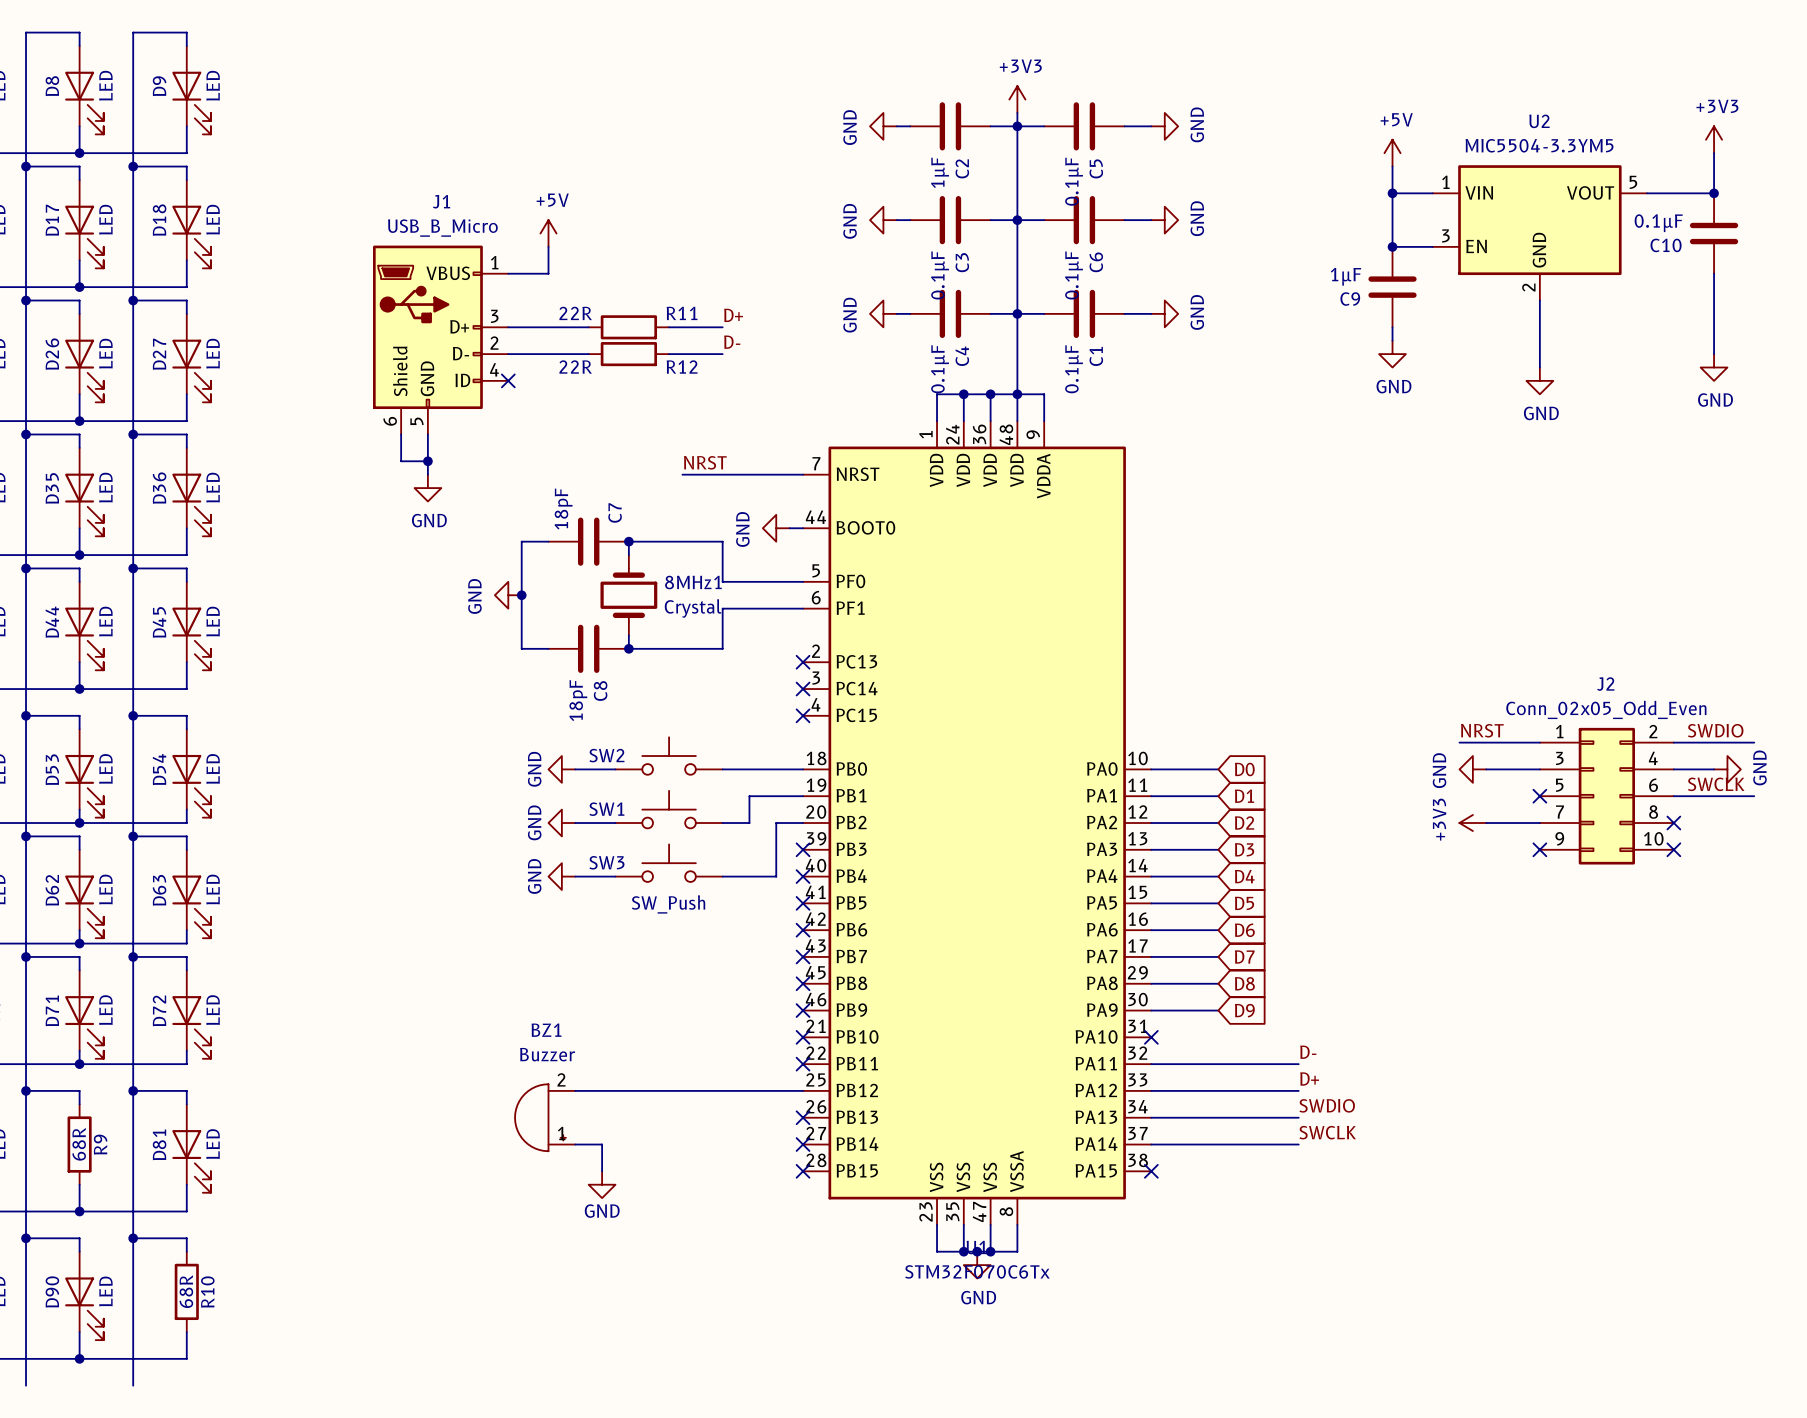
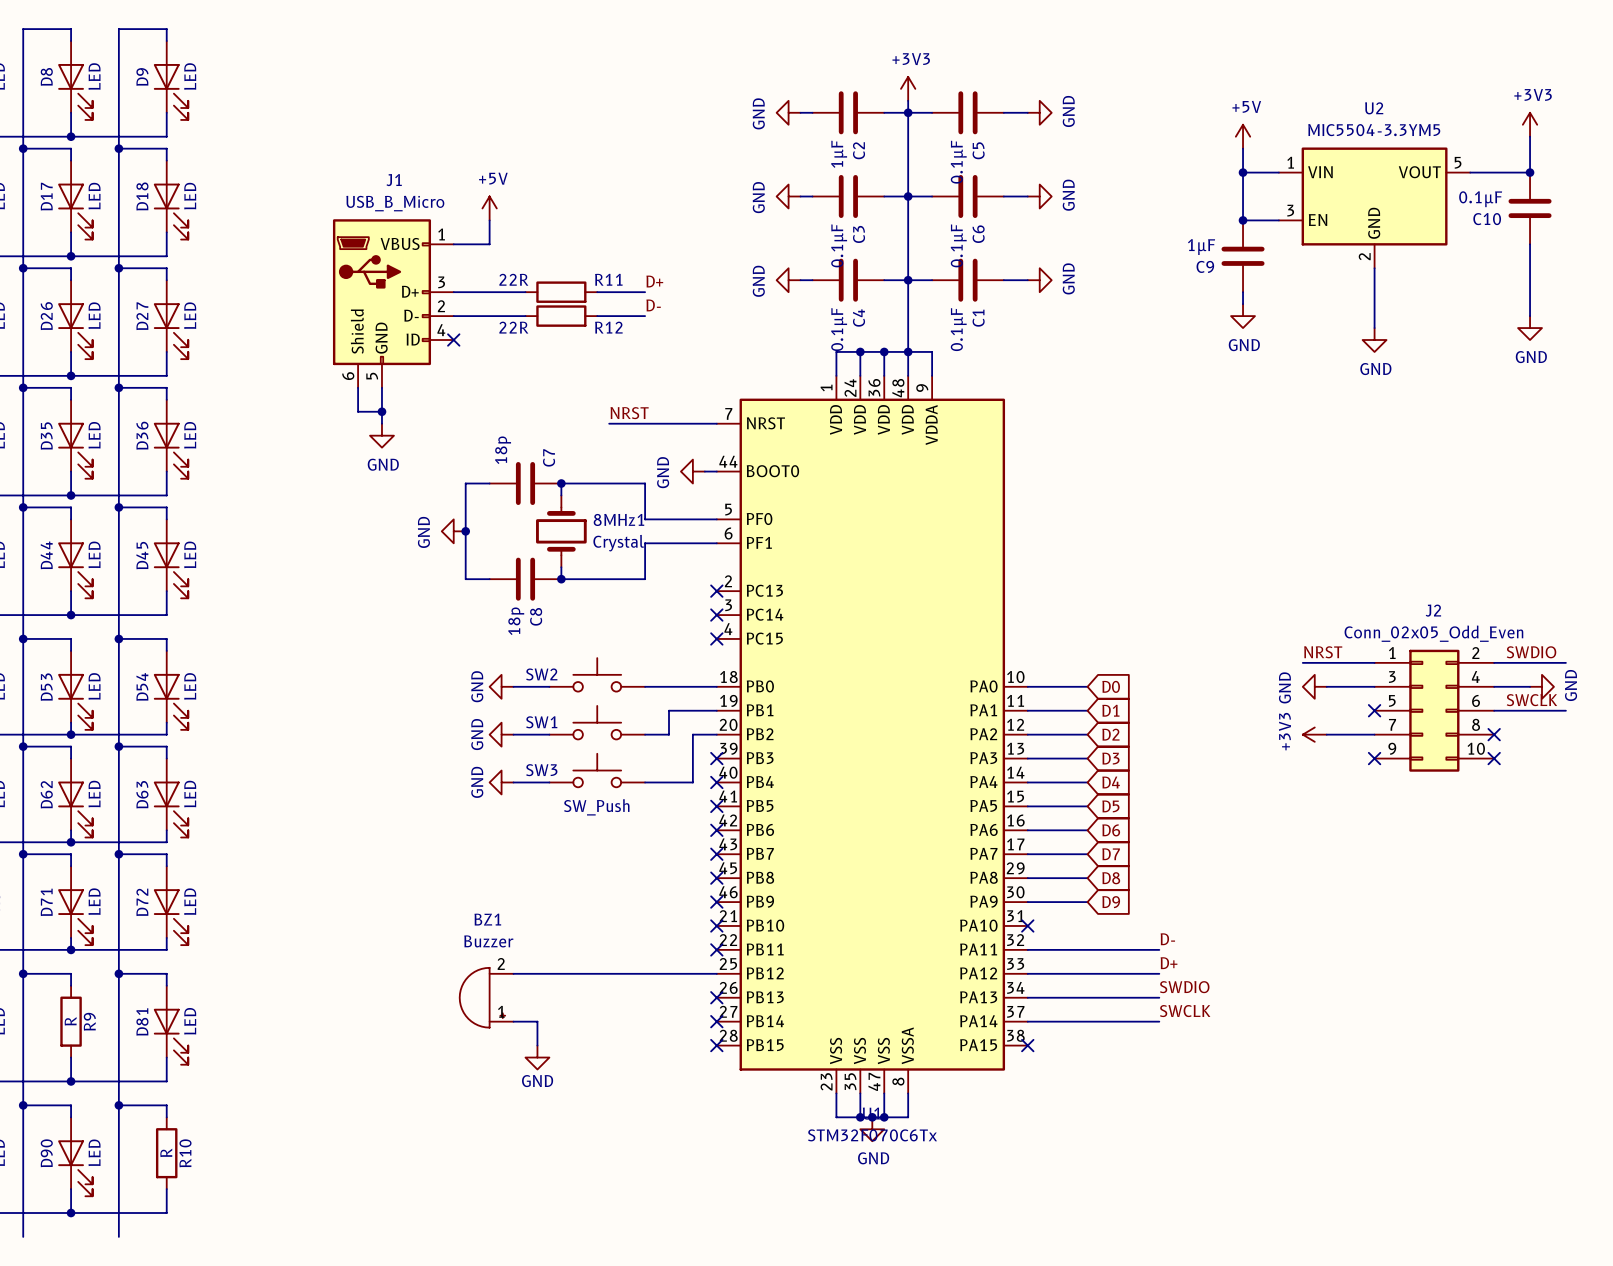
C7 value: 18pF (563, 509) -> 18p (503, 450)
C8 value: 18pF (578, 700) -> 18p (516, 621)
R9 value: 68R (79, 1144) -> R (70, 1021)
R10 value: 68R (186, 1291) -> R (166, 1152)

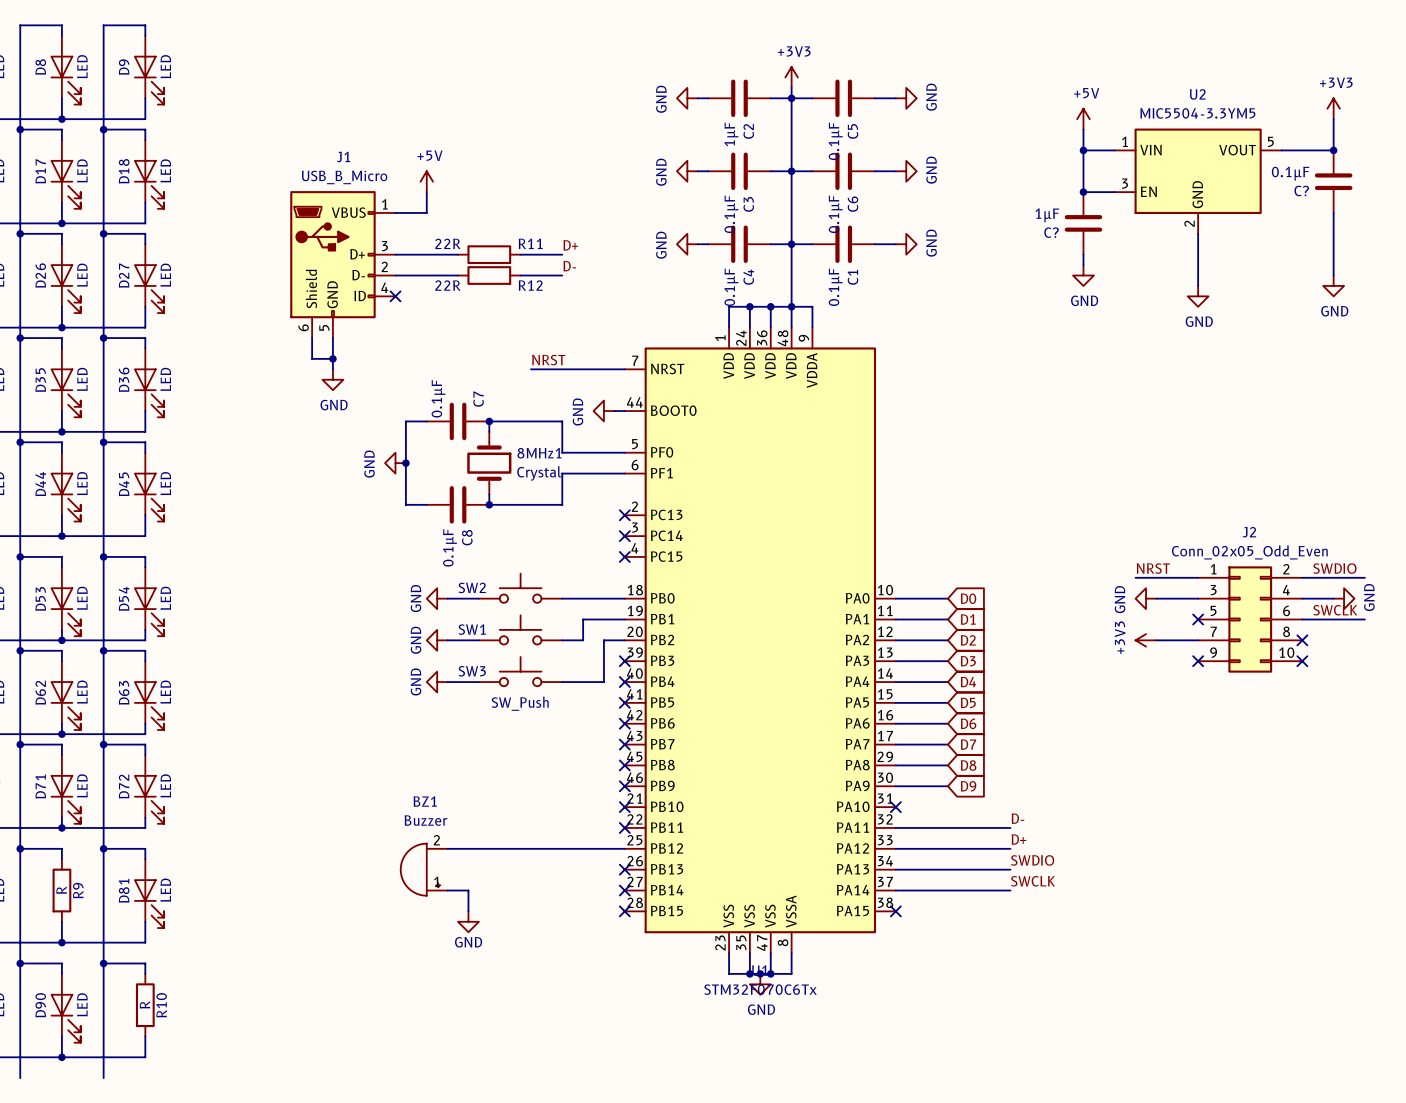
C10 name: C10 (1487, 219) -> C? (1301, 190)
C9 name: C9 (1205, 266) -> C? (1051, 232)
C7 value: 18p (503, 450) -> 0.1µF (438, 398)
C8 value: 18p (516, 621) -> 0.1µF (449, 547)

